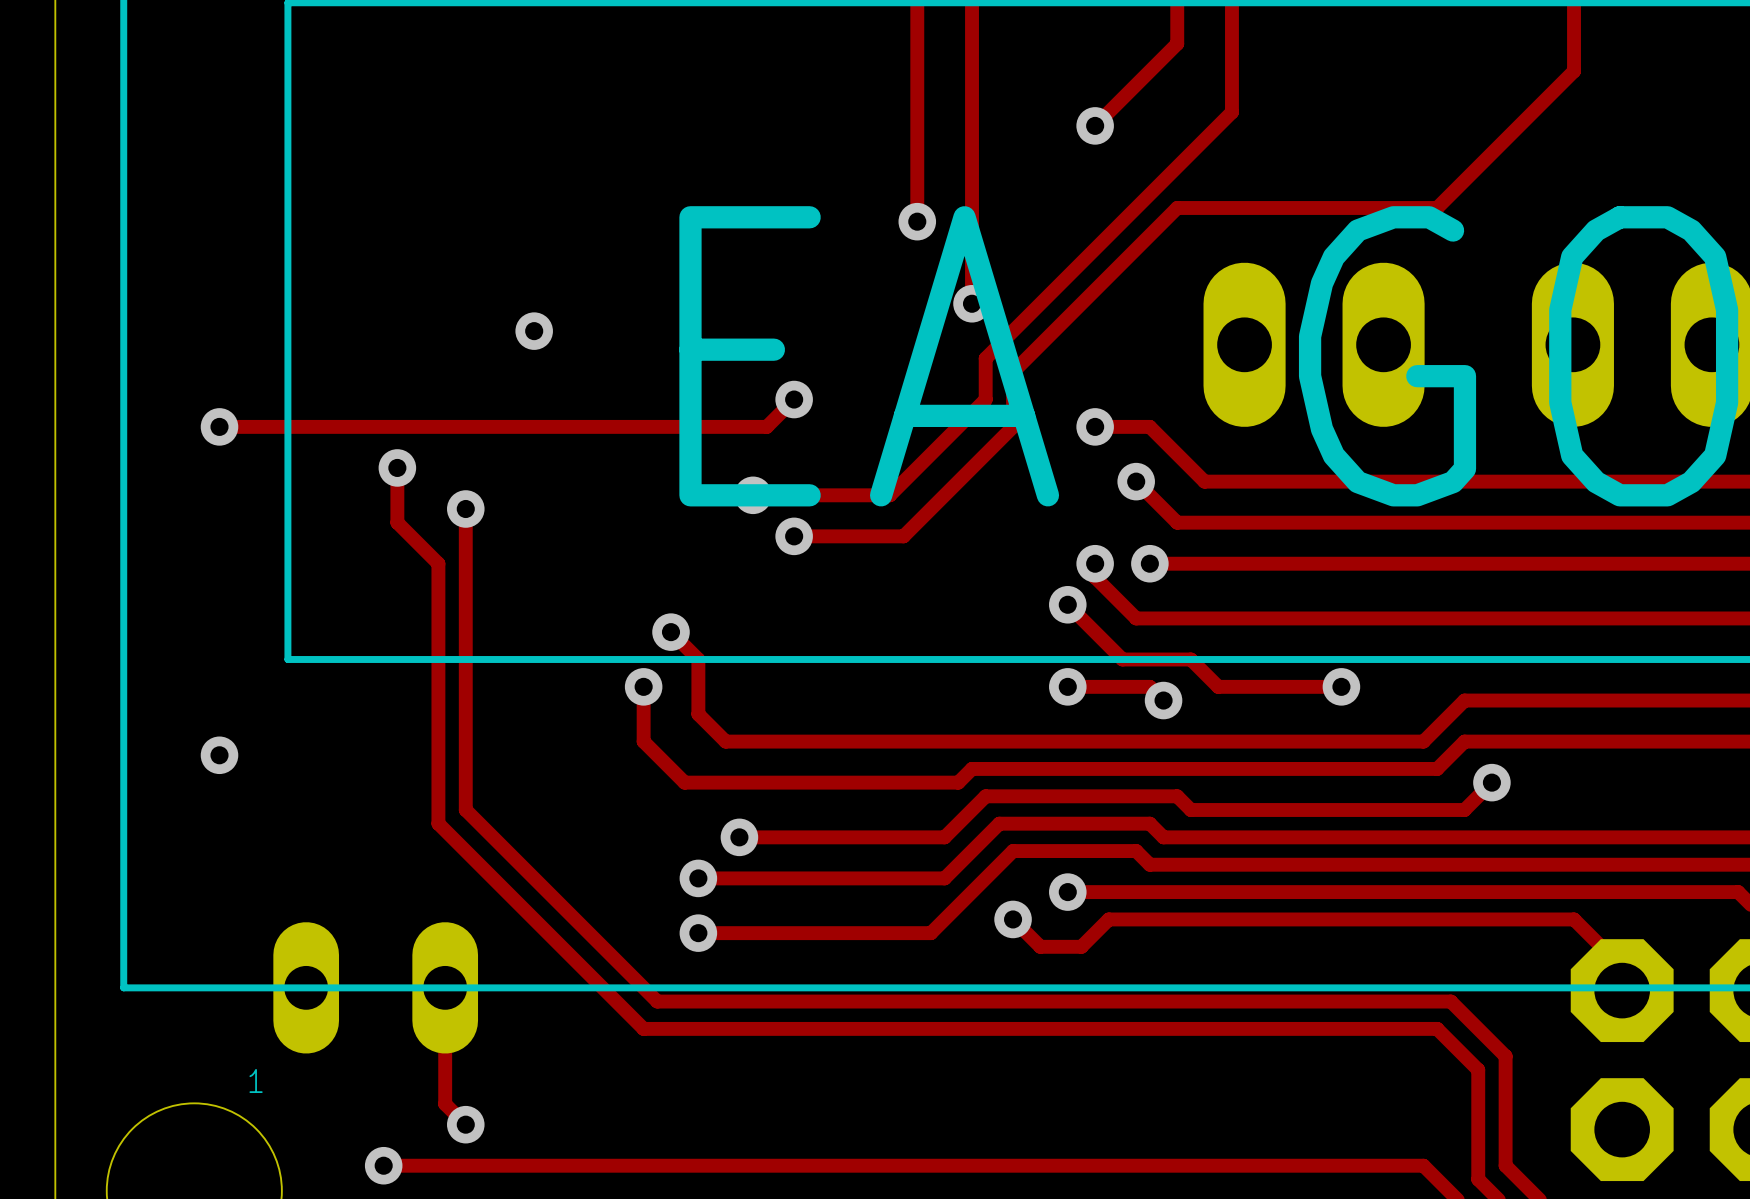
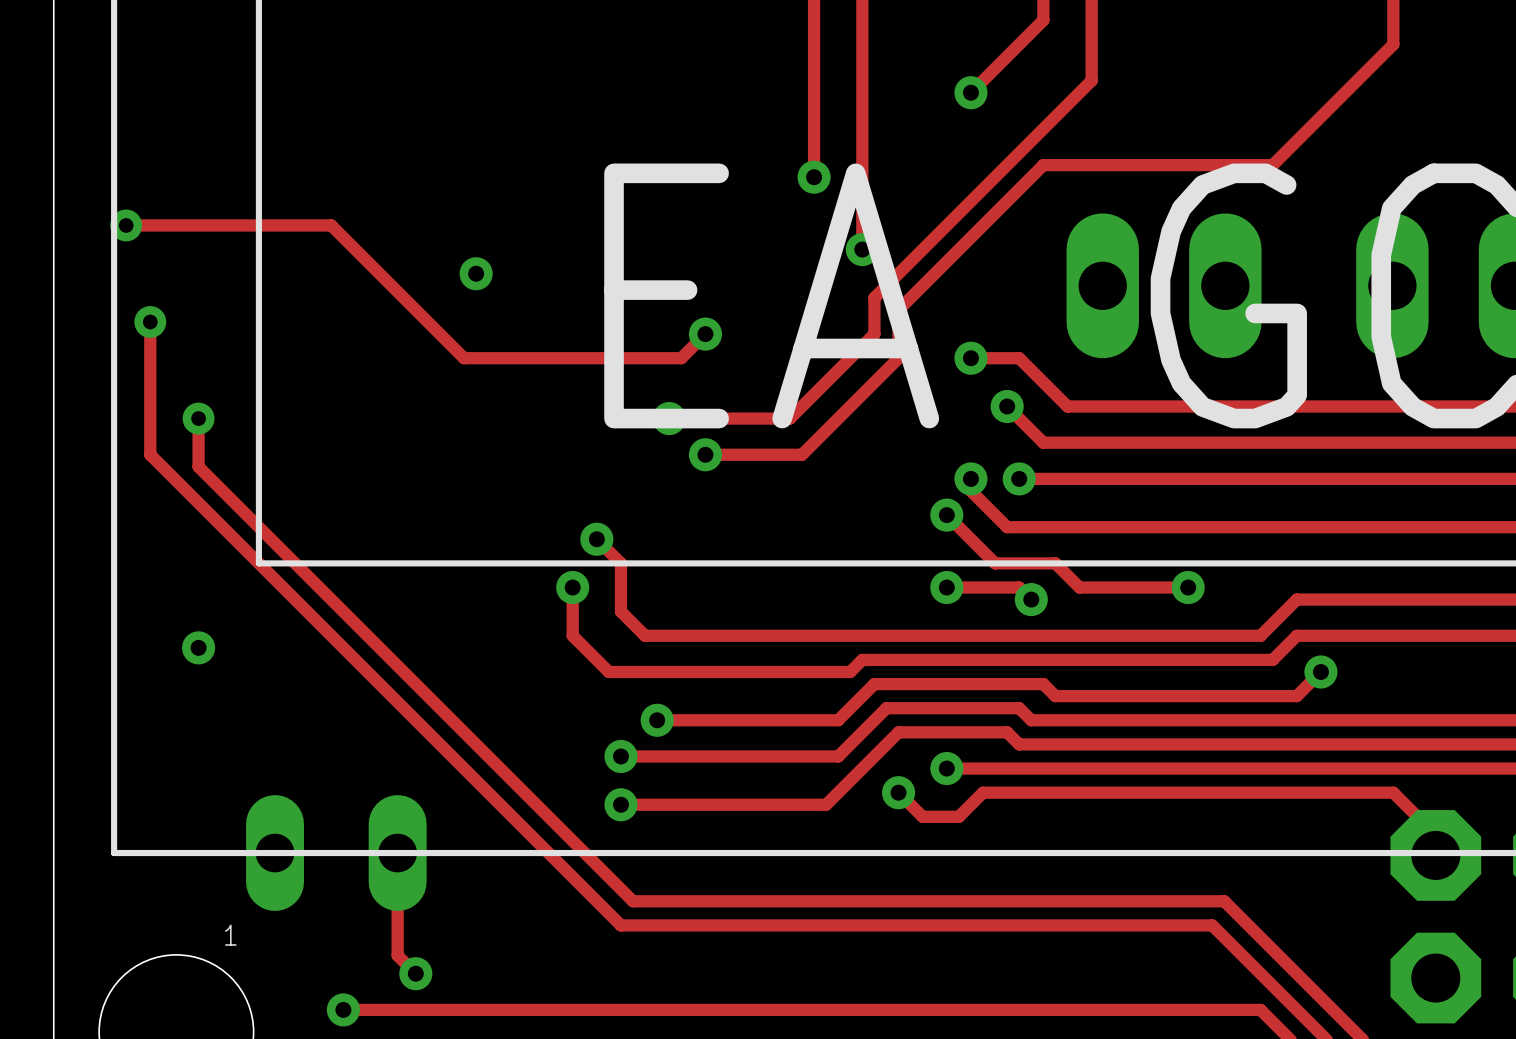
via: none -> (126, 225)
via: none -> (150, 322)
track: (219, 426) (520, 426) -> (126, 225) (331, 225) (464, 358)
via: (219, 426) -> none
track: (397, 467) (397, 522) (438, 563) (438, 823) (643, 1028) (1437, 1028) (1478, 1069) (1478, 1179) -> (150, 322) (150, 454) (620, 925) (1212, 925) (1308, 1021)
via: (397, 467) -> none
via: none -> (198, 418)
track: (465, 508) (465, 810) (657, 1001) (1450, 1001) (1505, 1056) (1505, 1165) -> (198, 418) (198, 466) (633, 901) (1224, 901) (1333, 1009)
via: (465, 508) -> none

